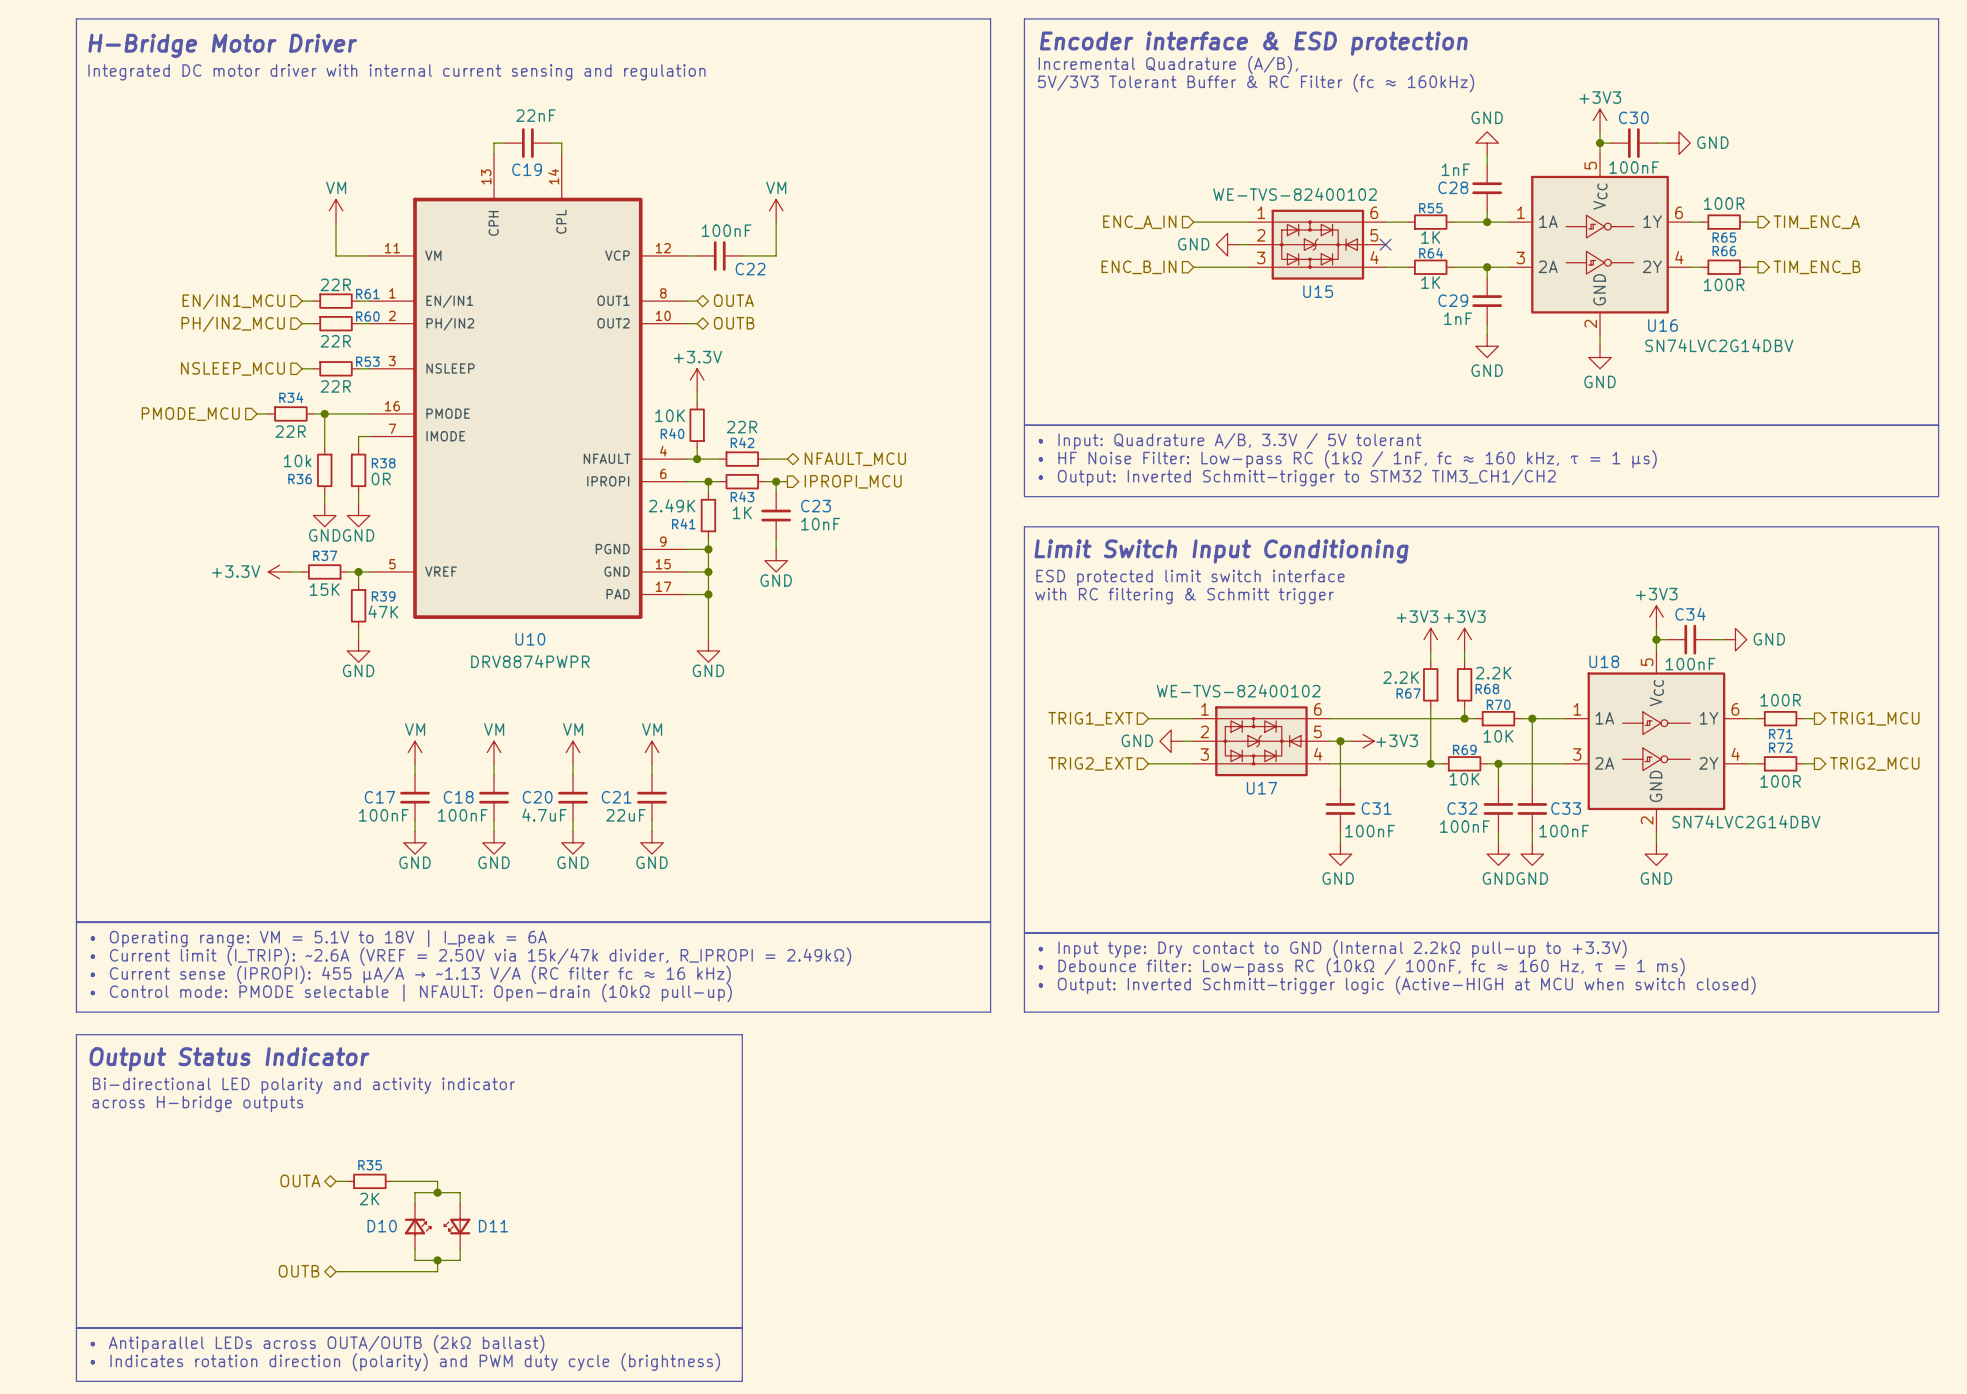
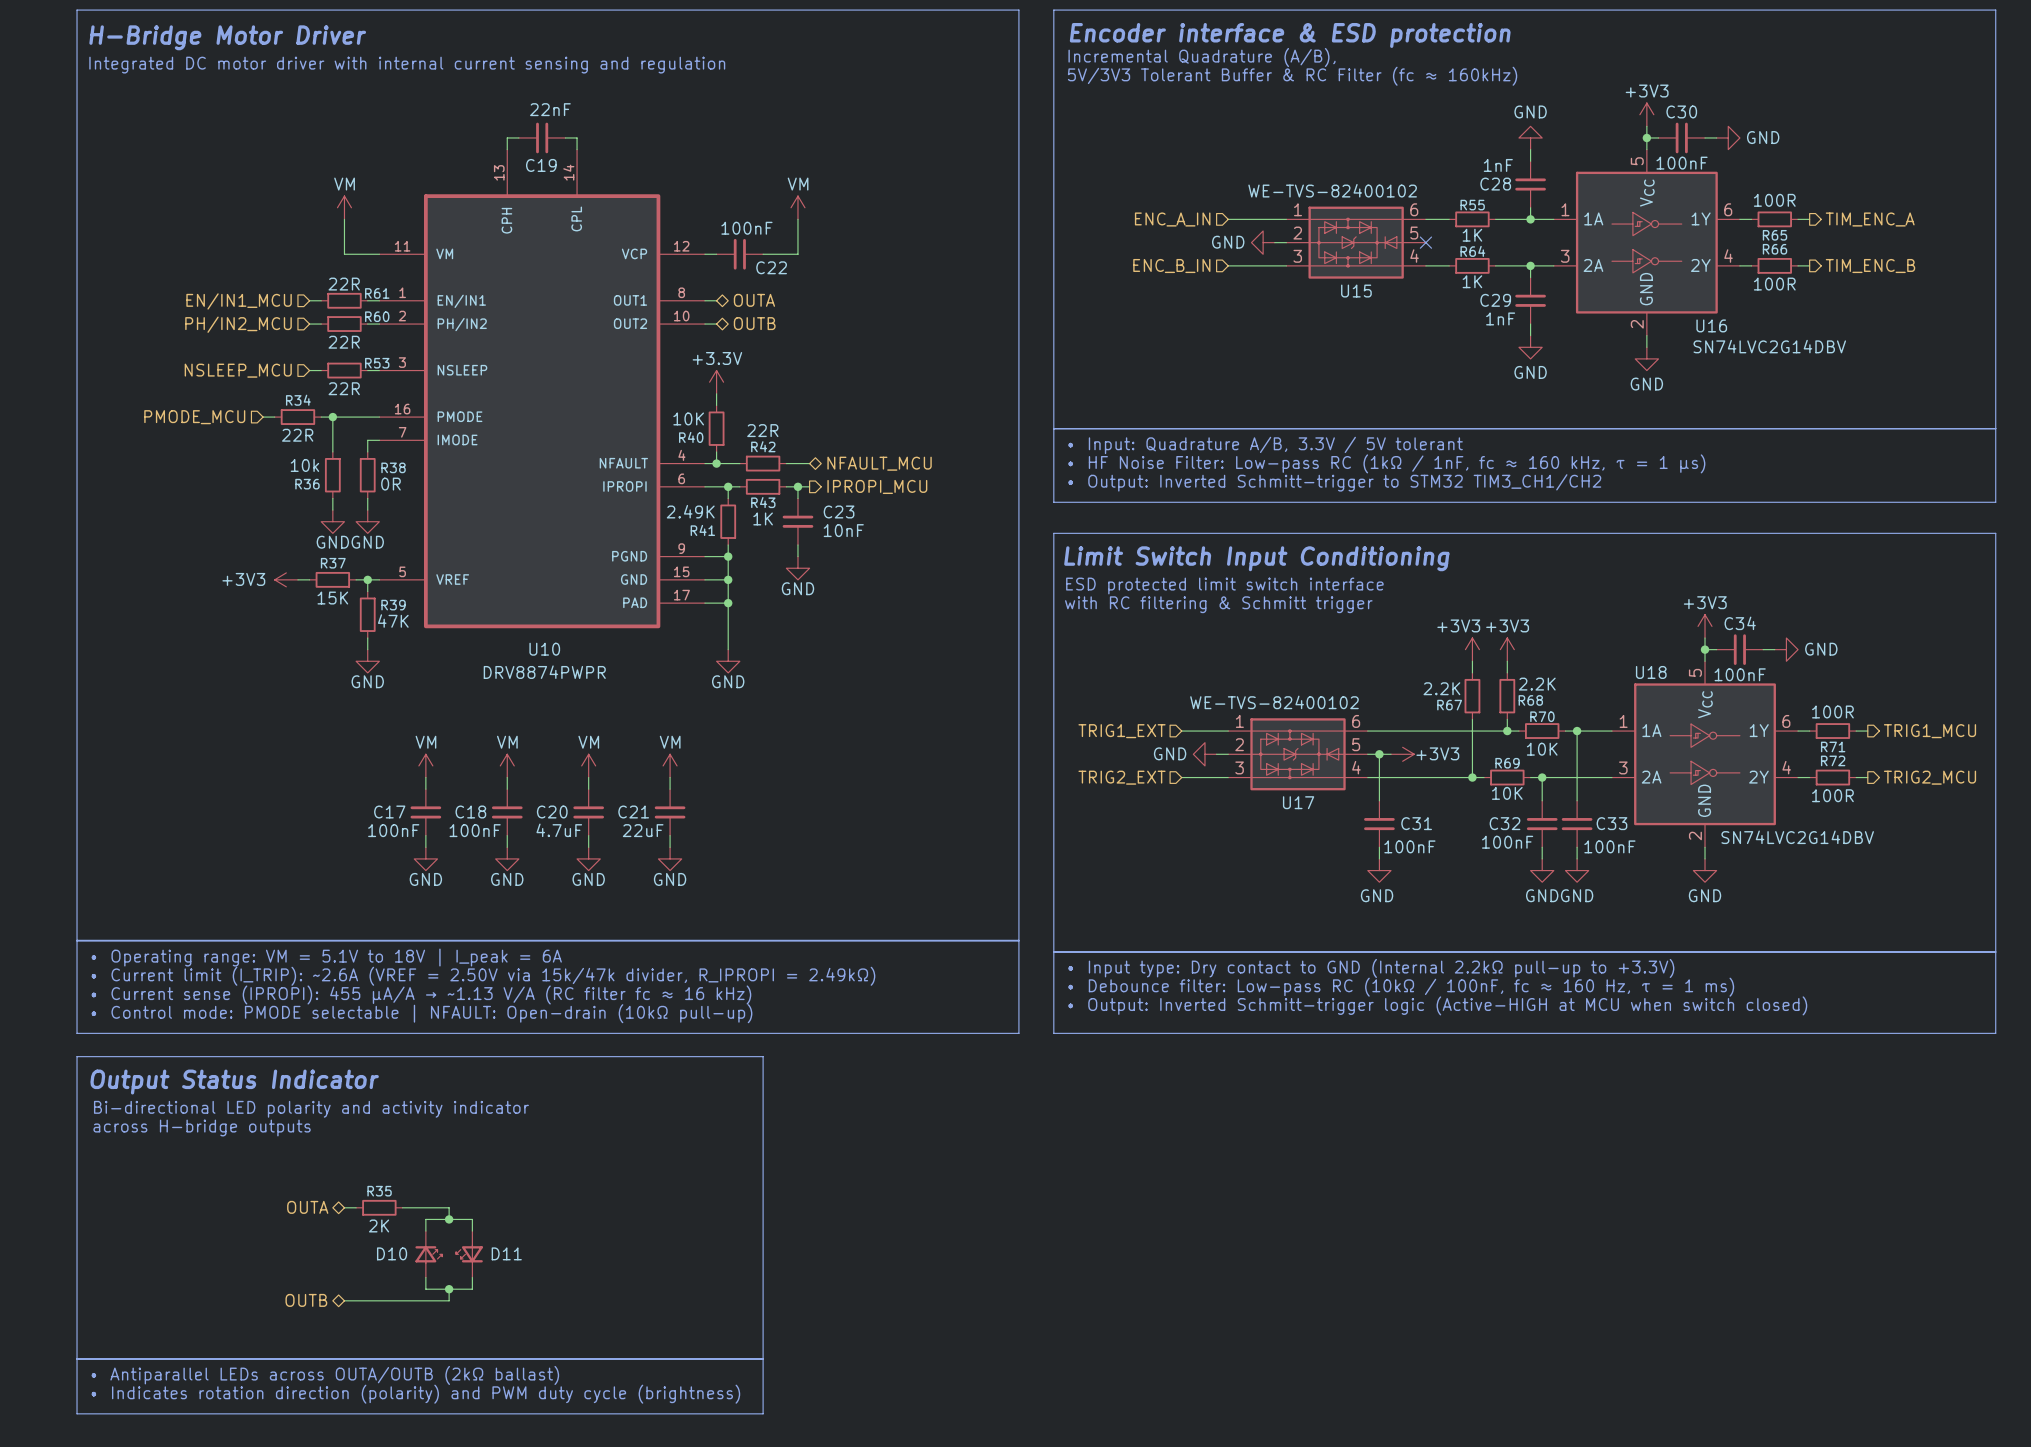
power symbol: +3.3V (279, 571) -> +3V3 (286, 579)

